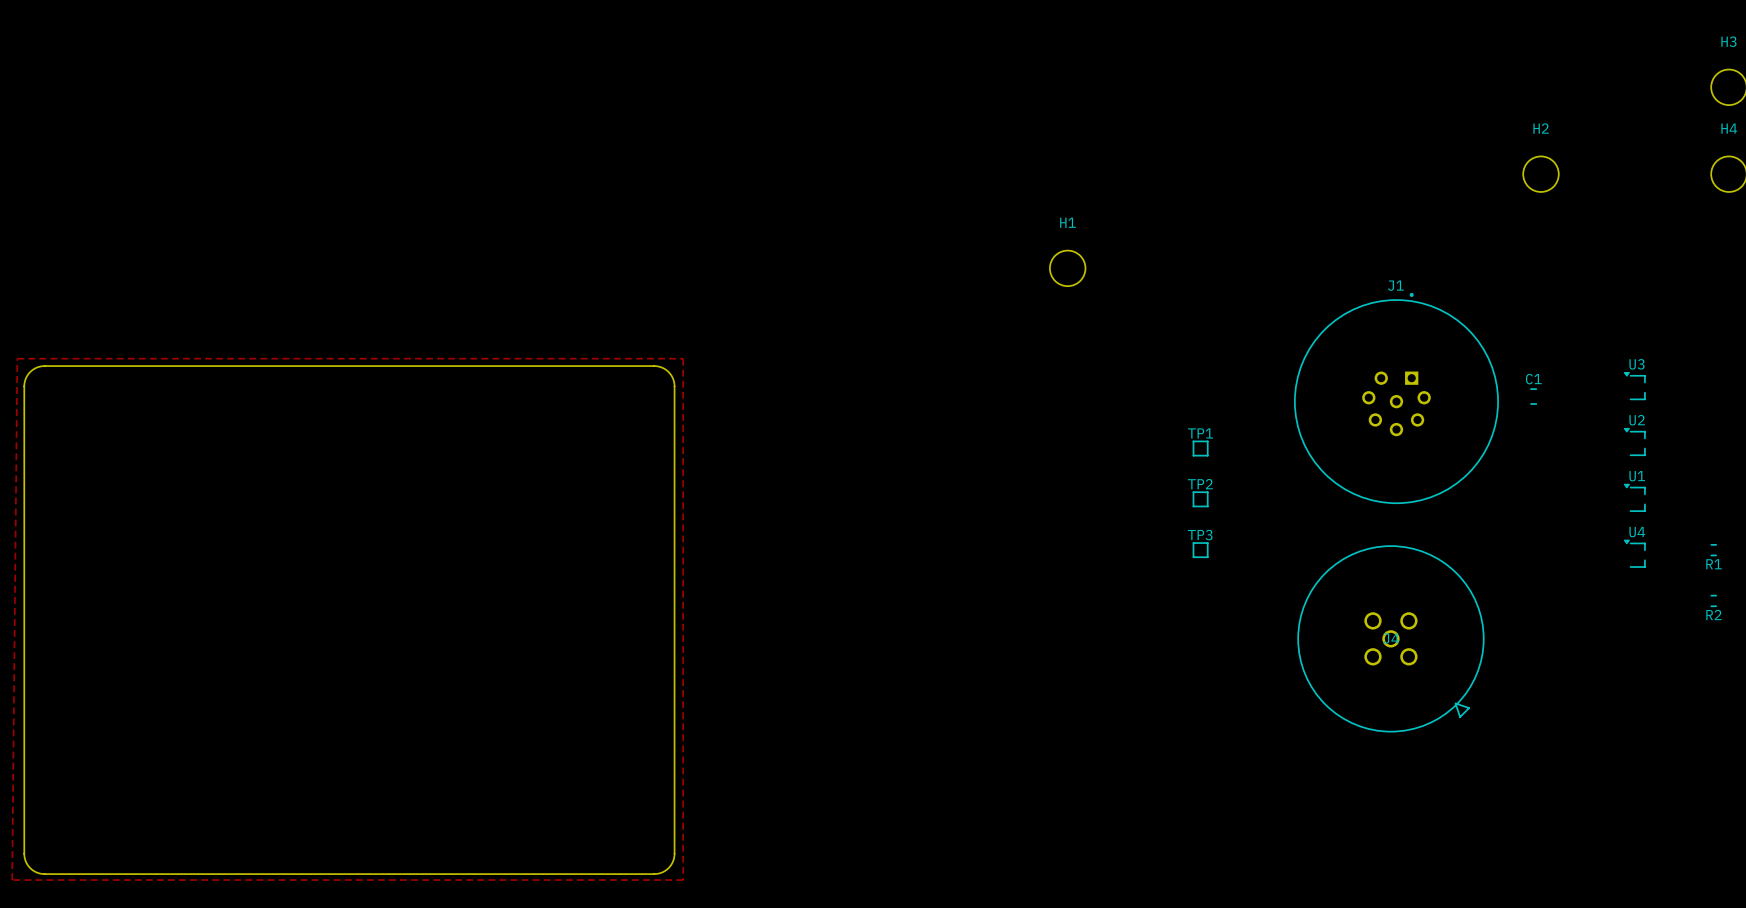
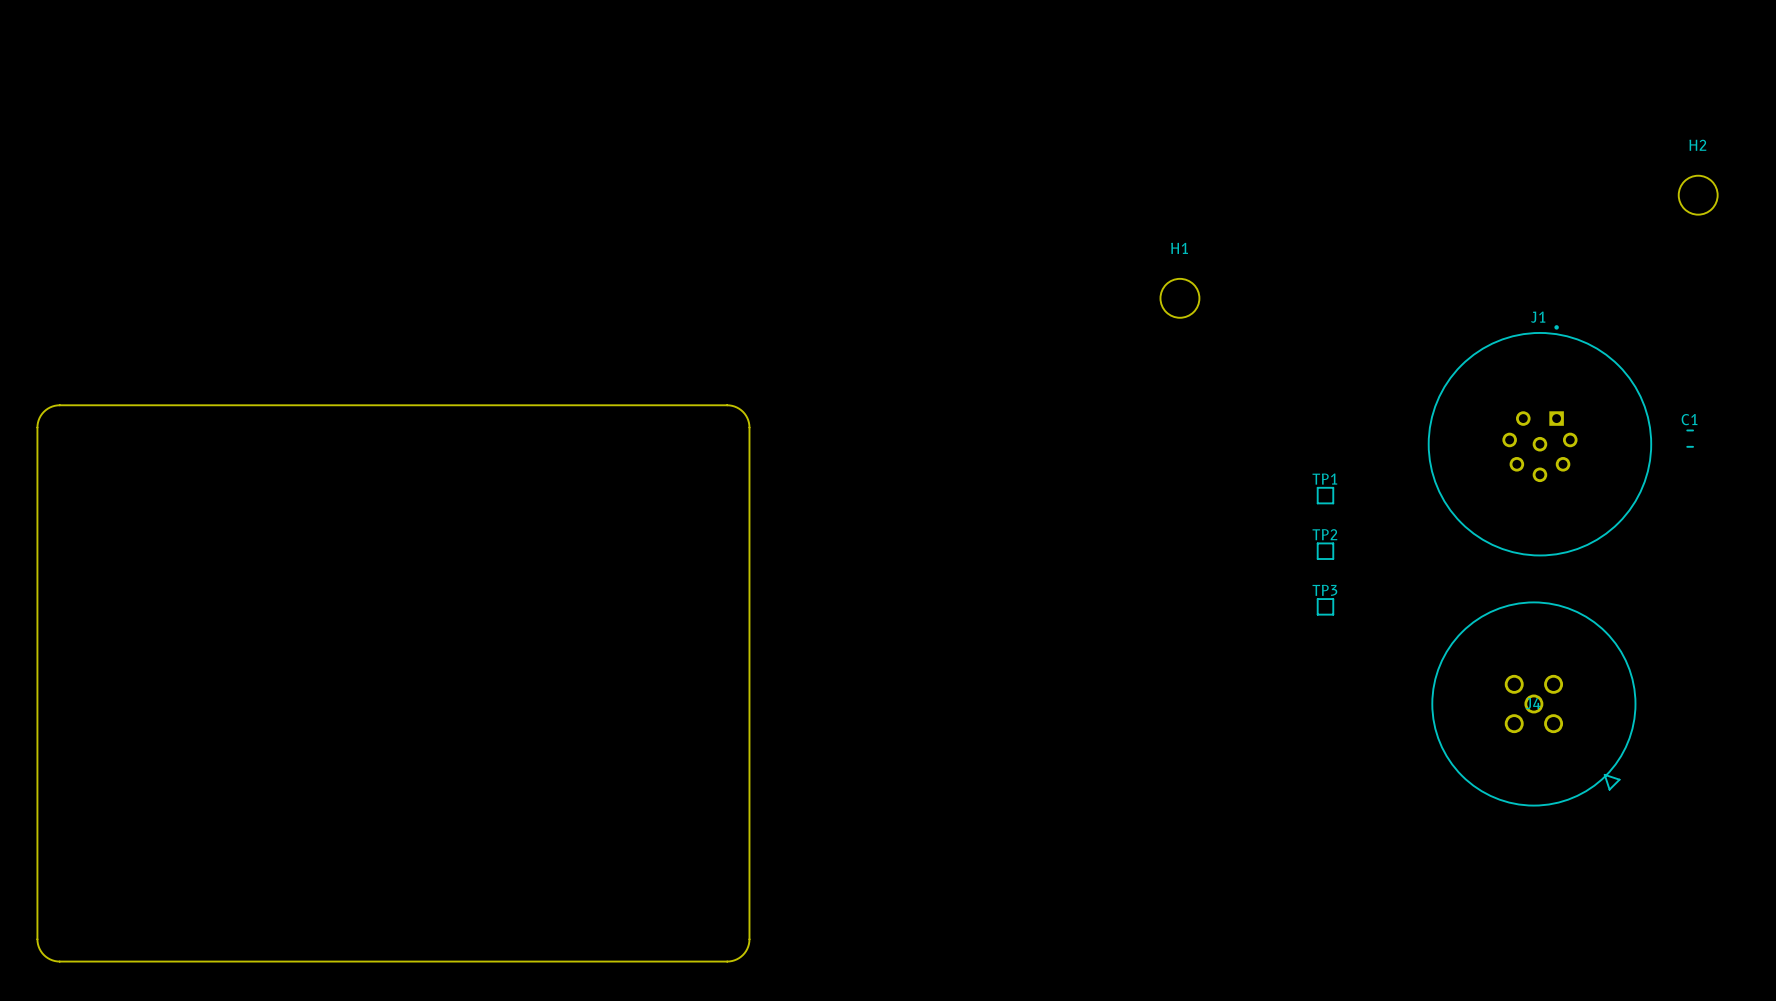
zone outline: (17, 358) (683, 358) (683, 880) (12, 880) (17, 358) -> none

